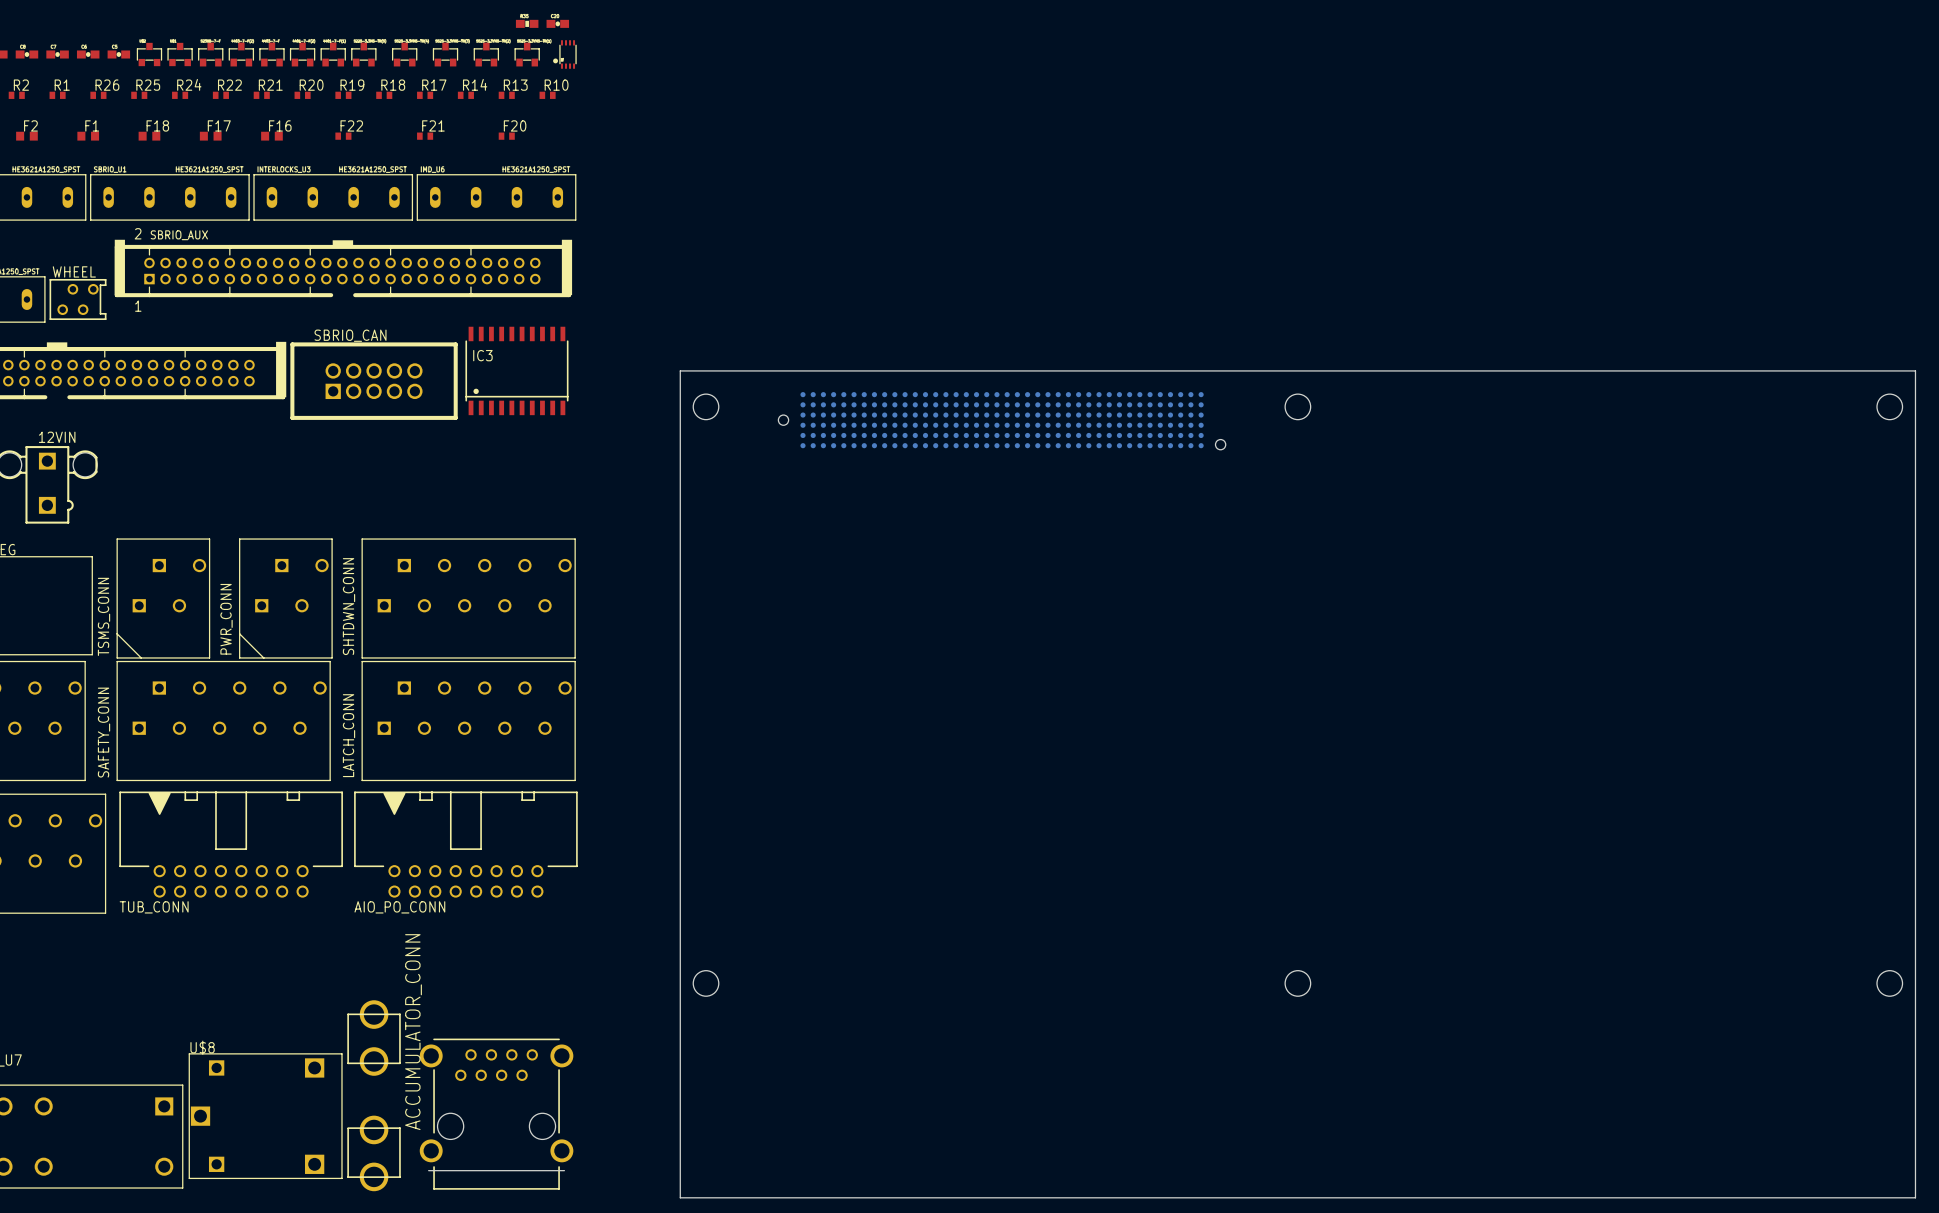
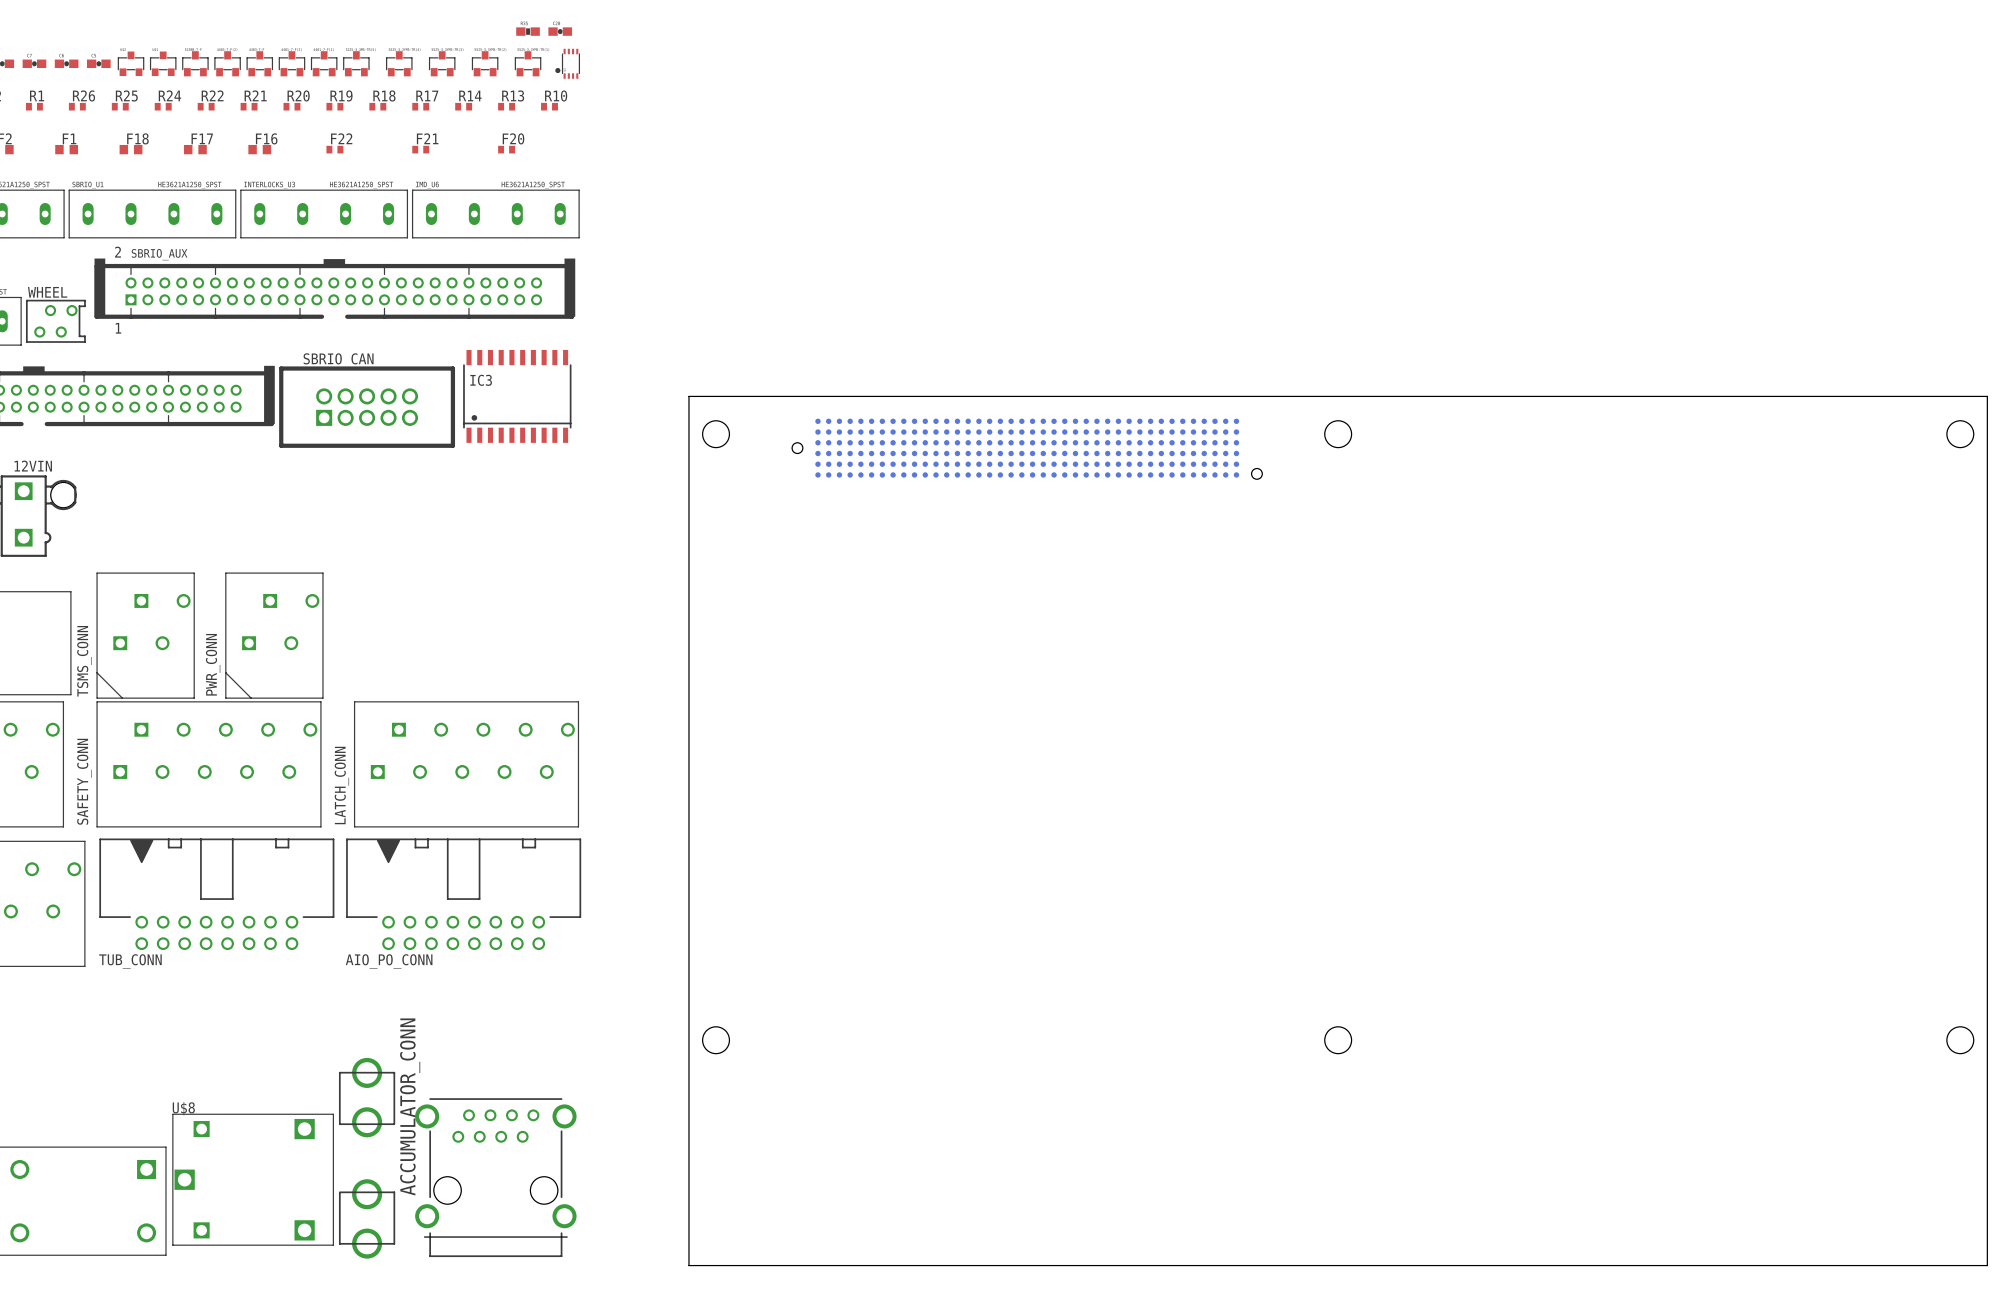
SHTDWN_CONN: (468, 598) -> none

